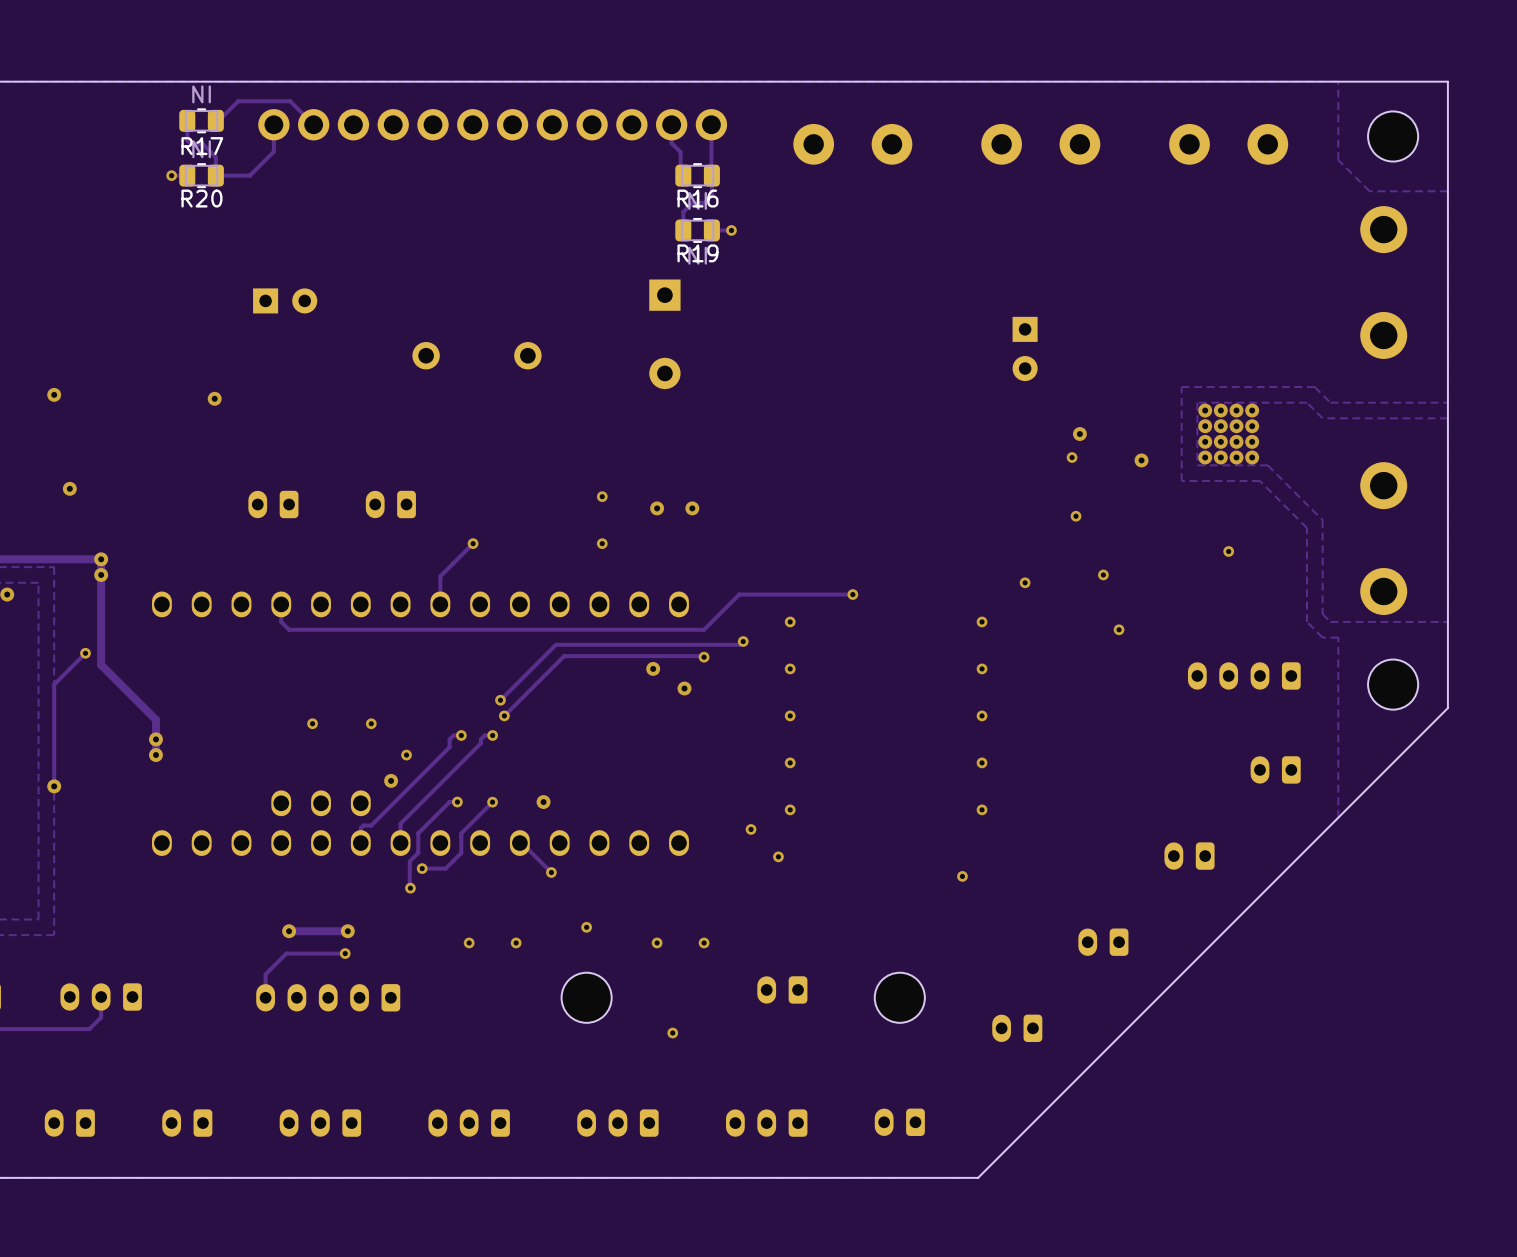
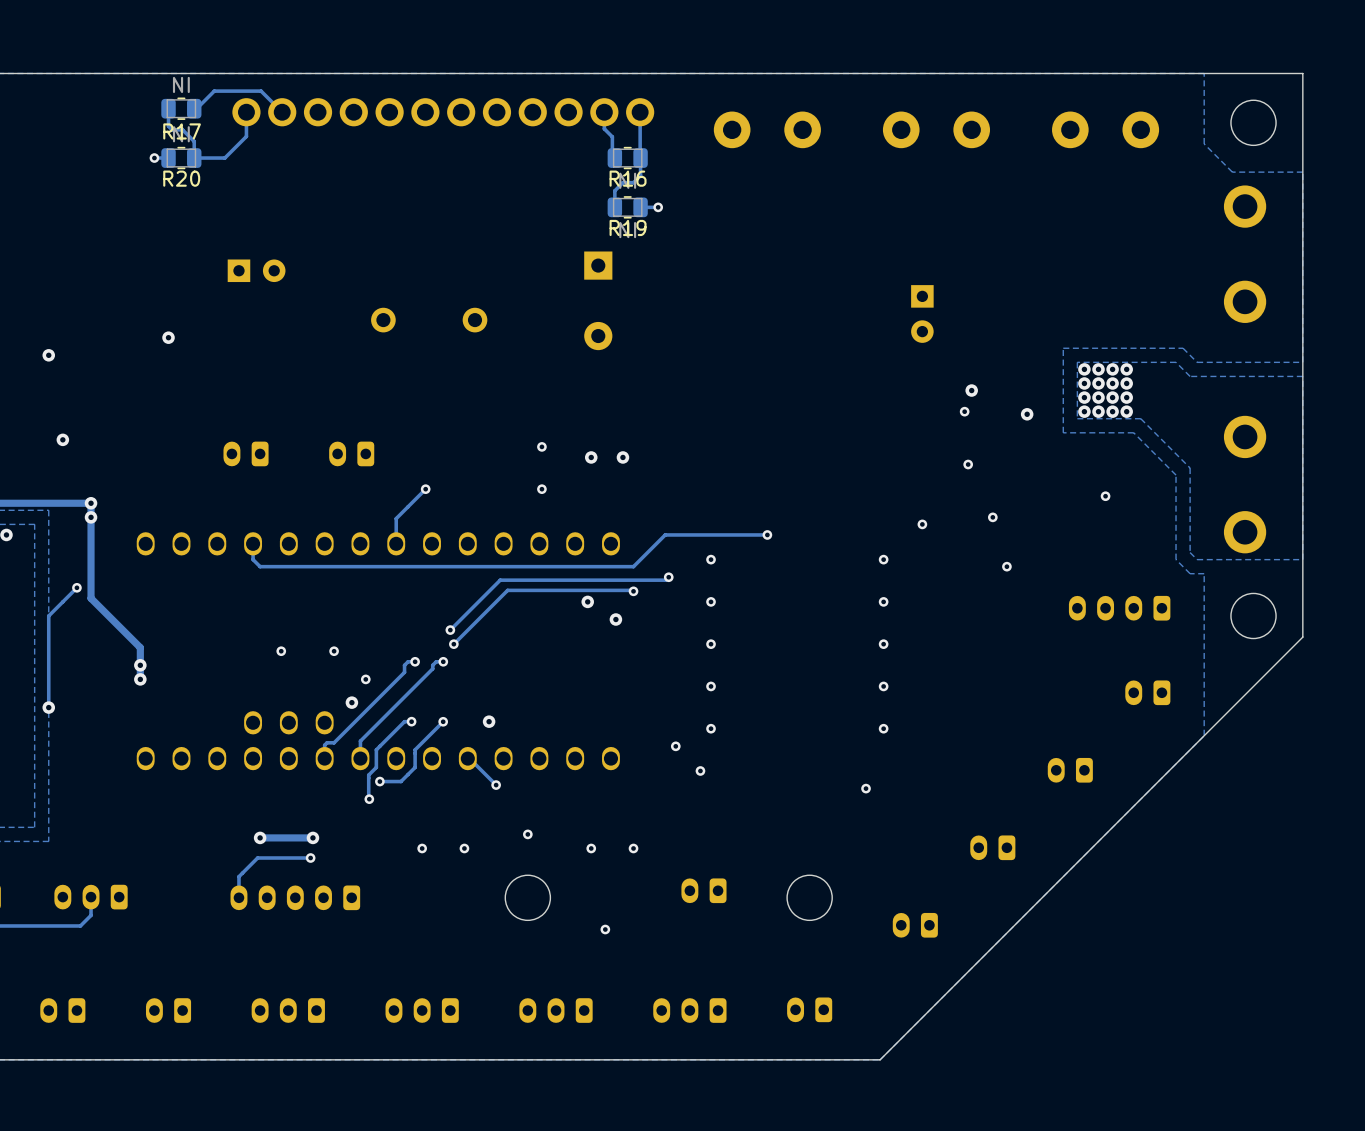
via position: (214, 398) -> (168, 337)

